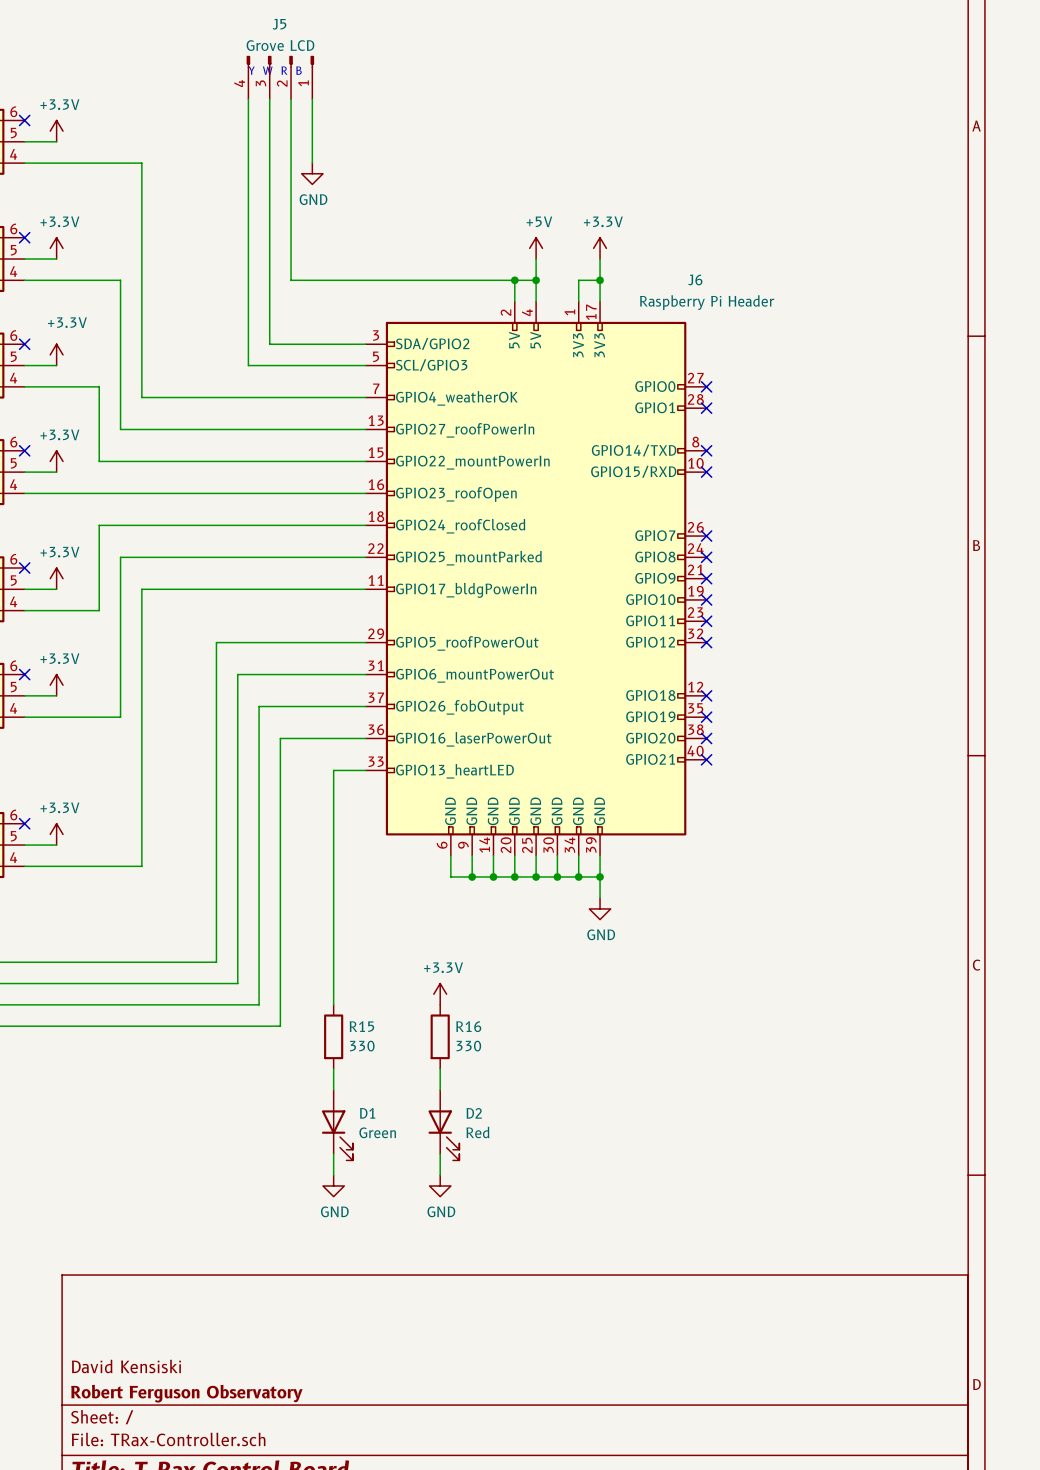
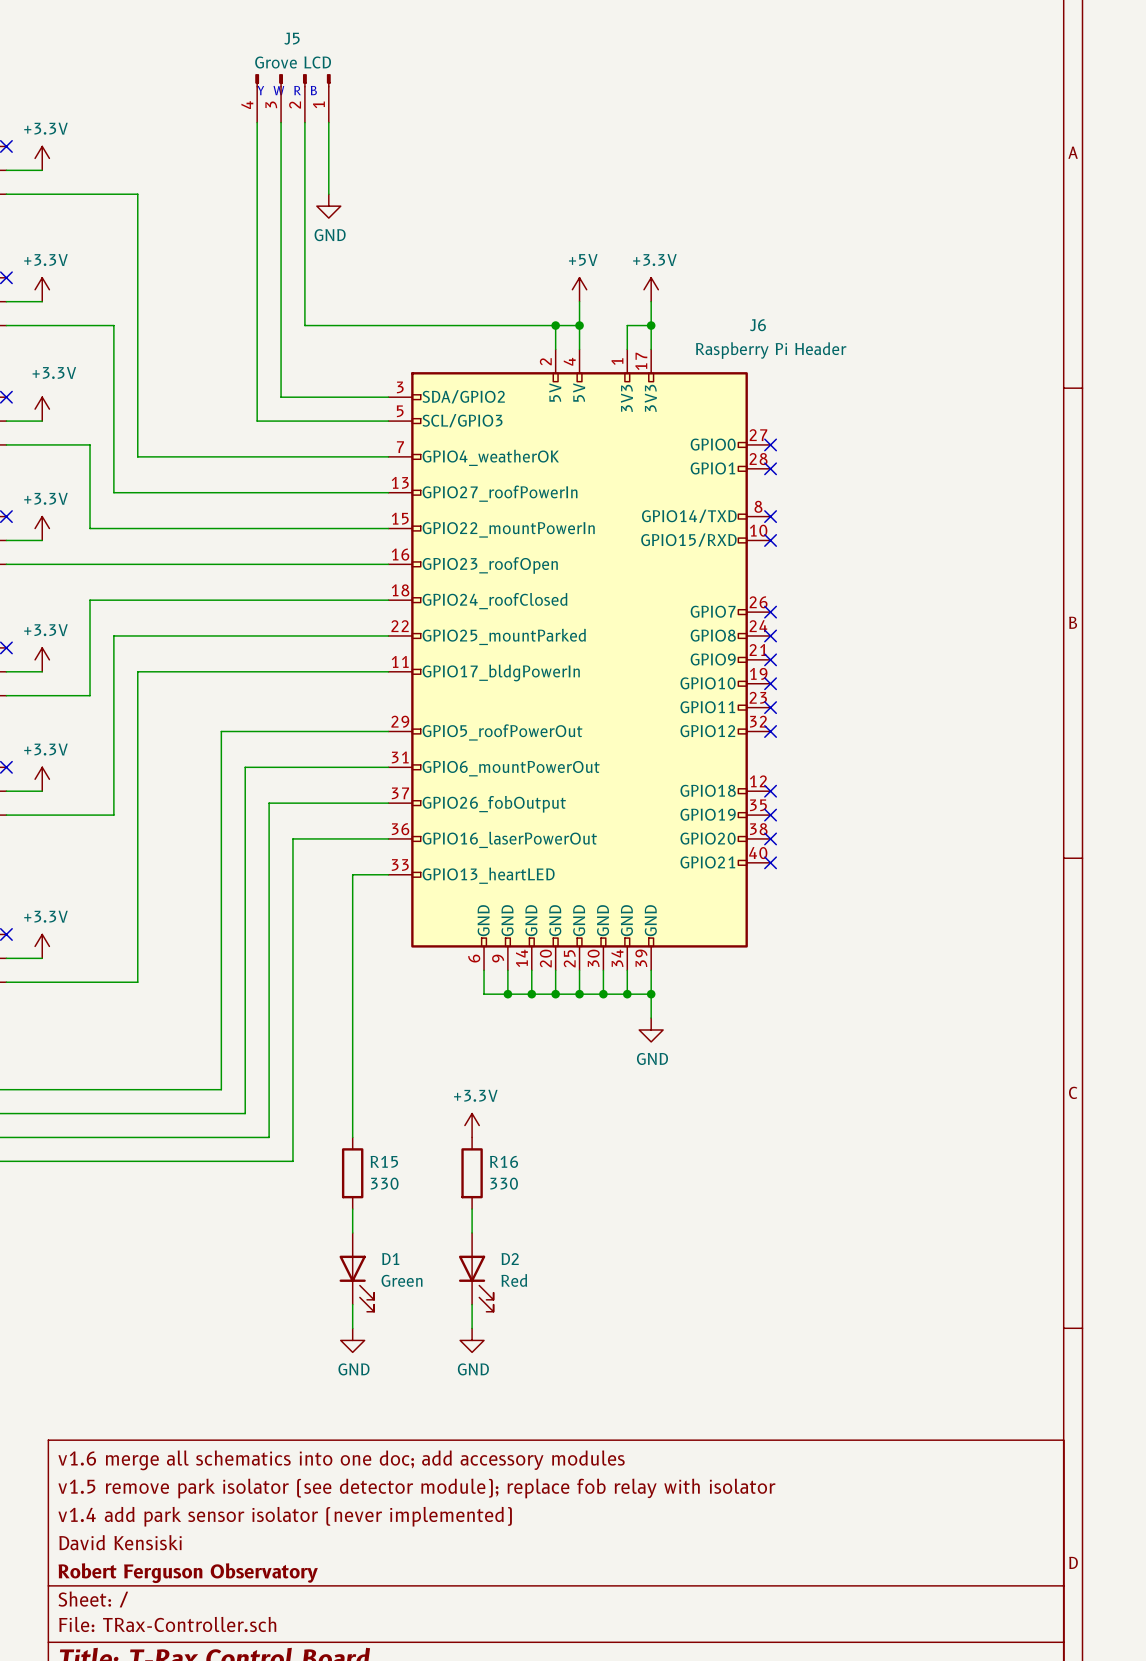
title block: none -> v1.6 merge all schematics into one doc; add accessory modules (341, 1460)
title block: none -> v1.5 remove park isolator (see detector module); replace fob relay with isolator (416, 1488)
title block: none -> v1.4 add park sensor isolator (never implemented) (285, 1516)

